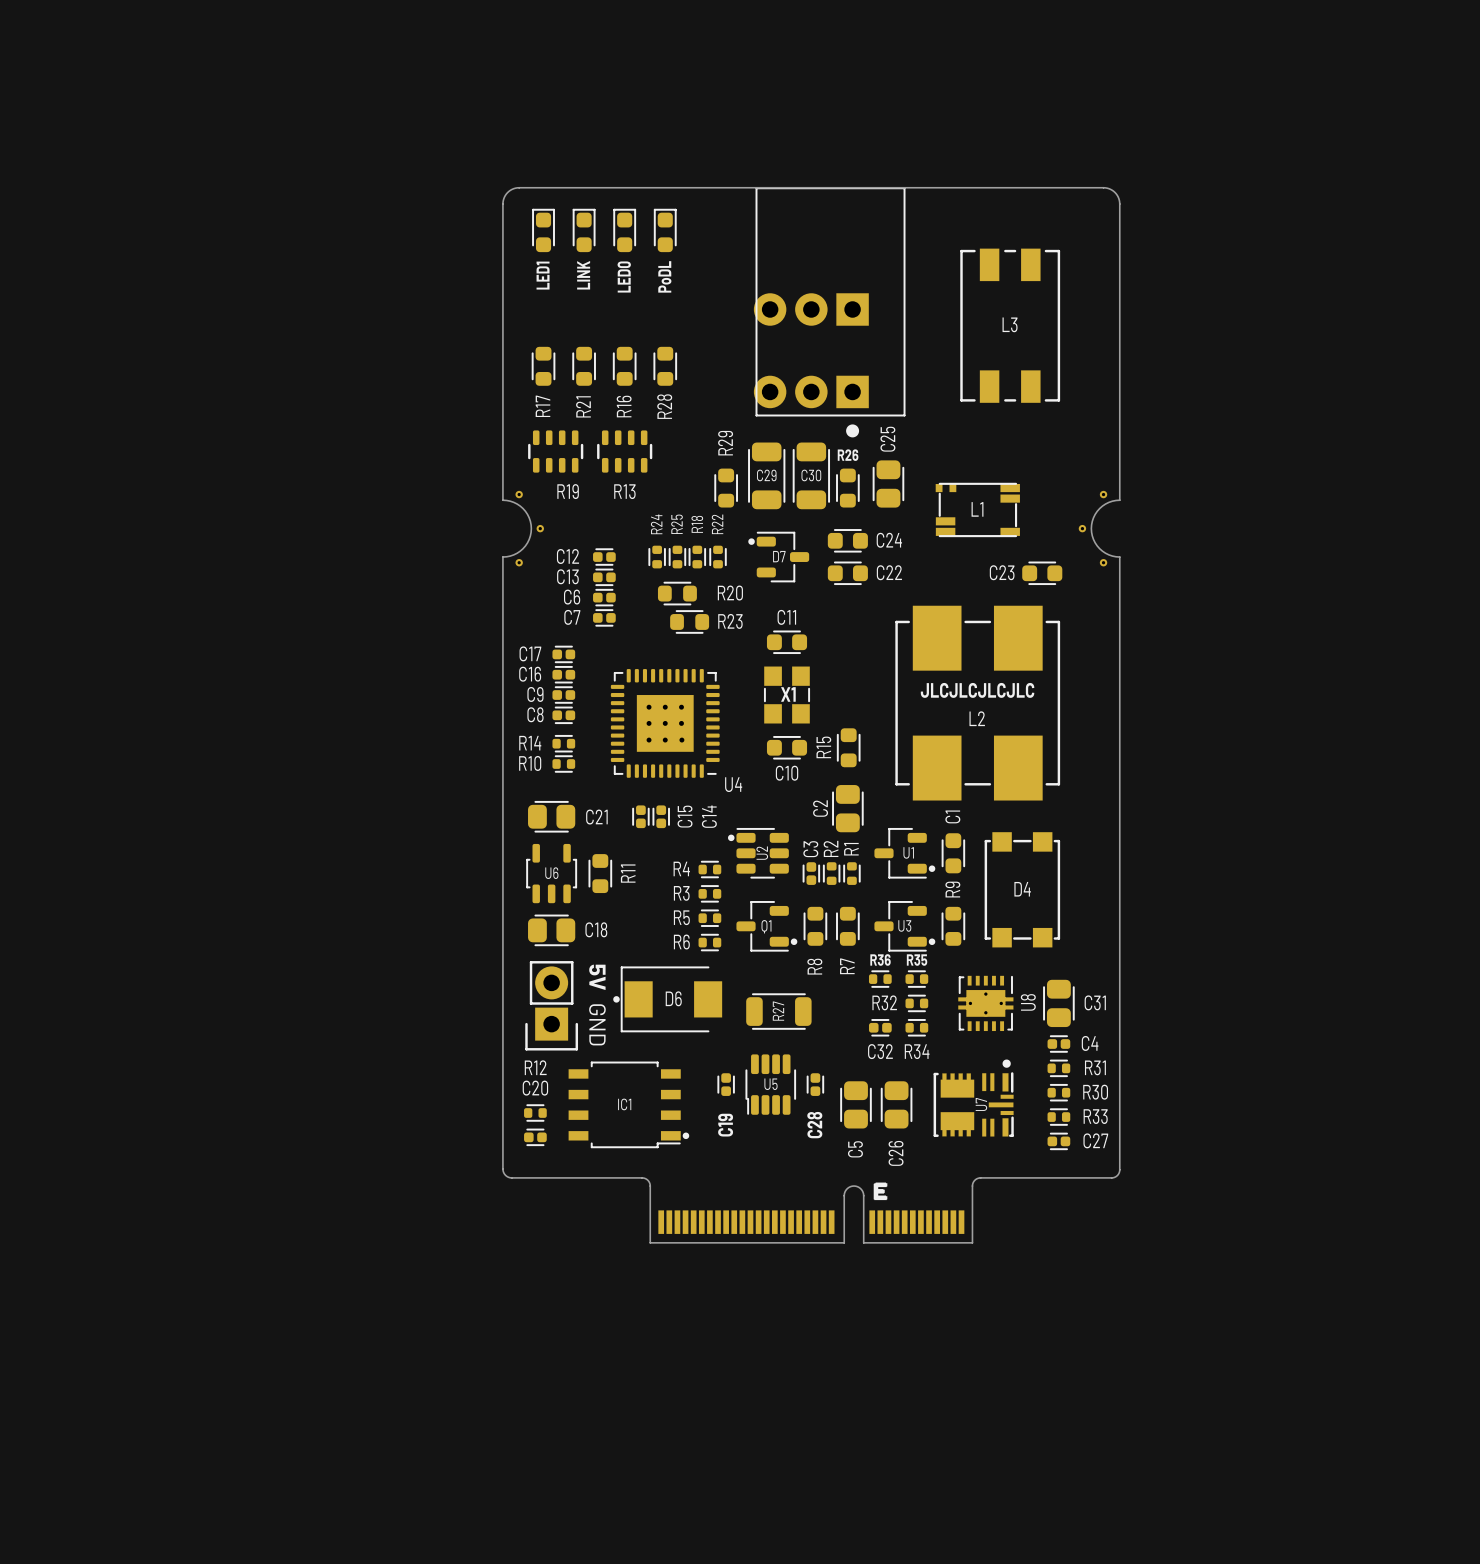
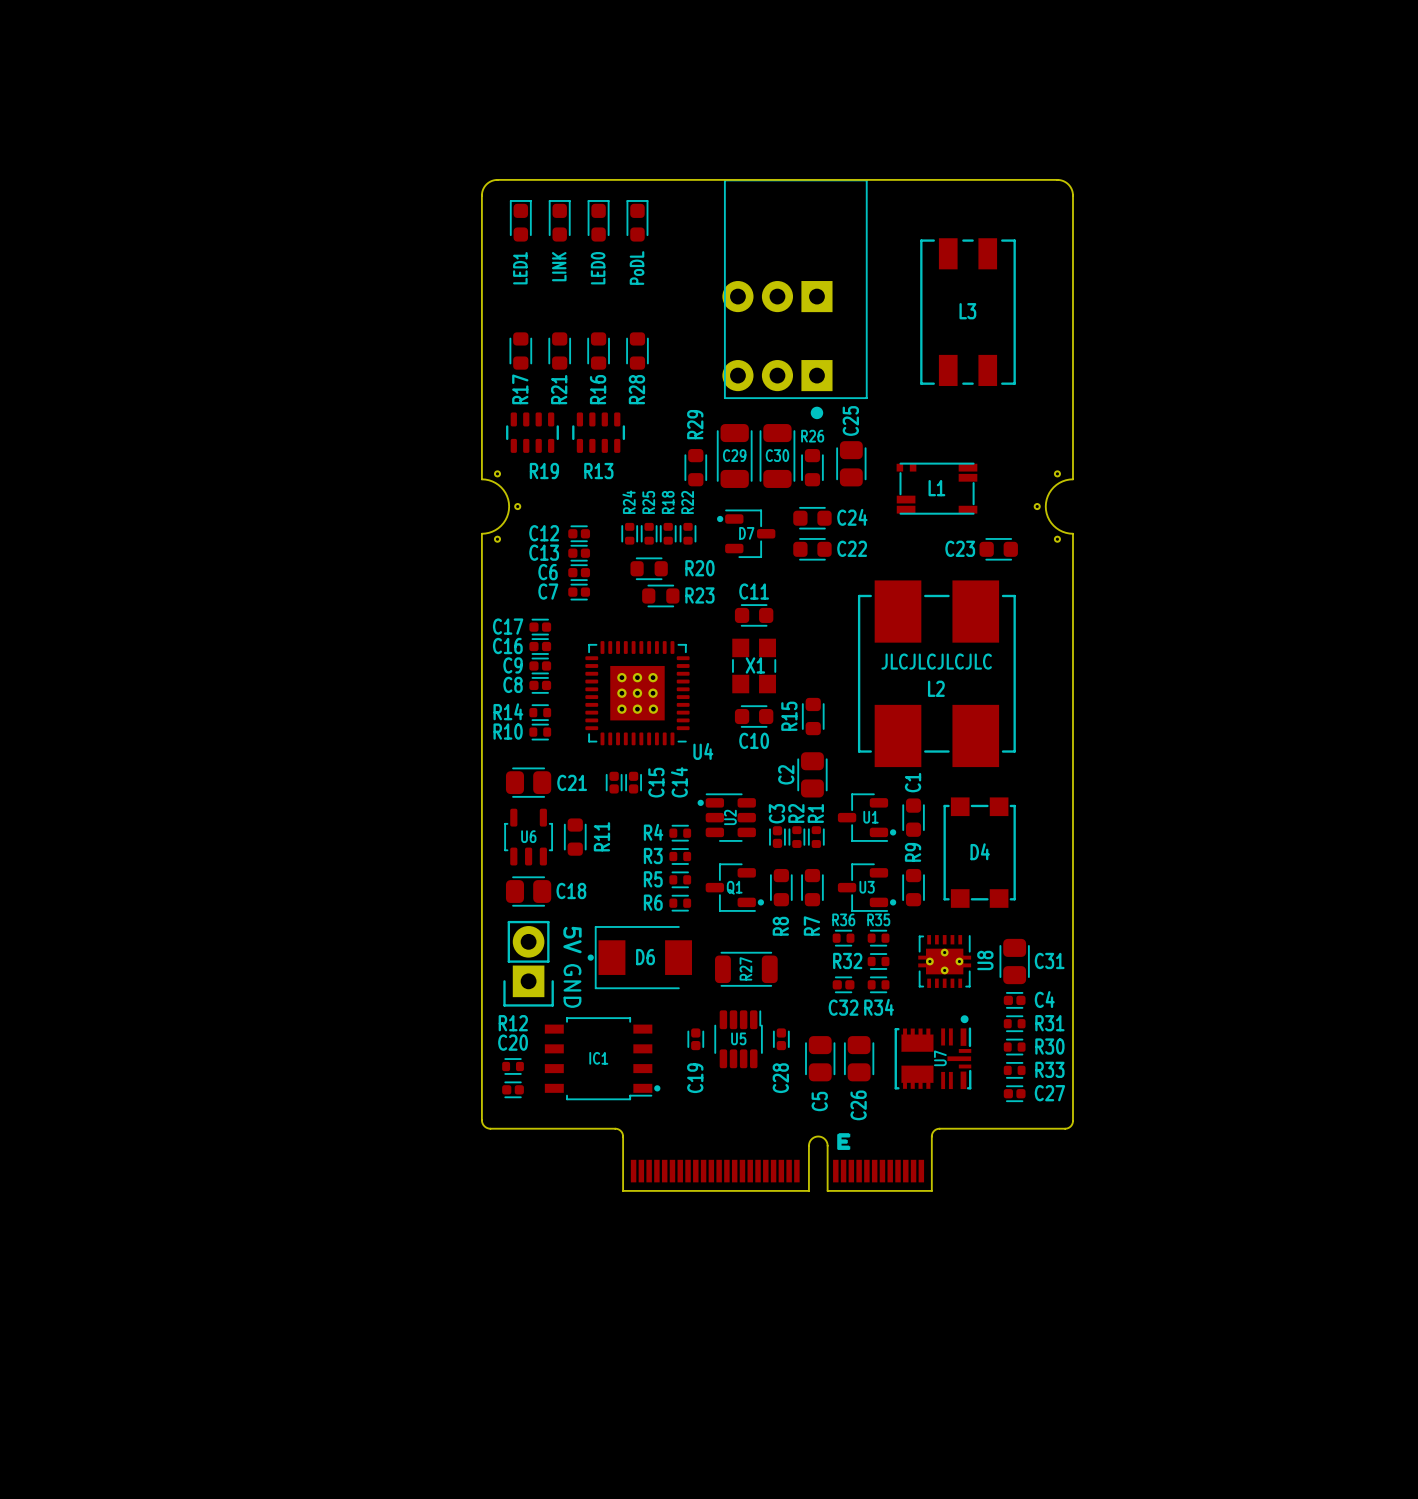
U5 rotation: 0° (770, 1084) -> 180° (738, 1039)

